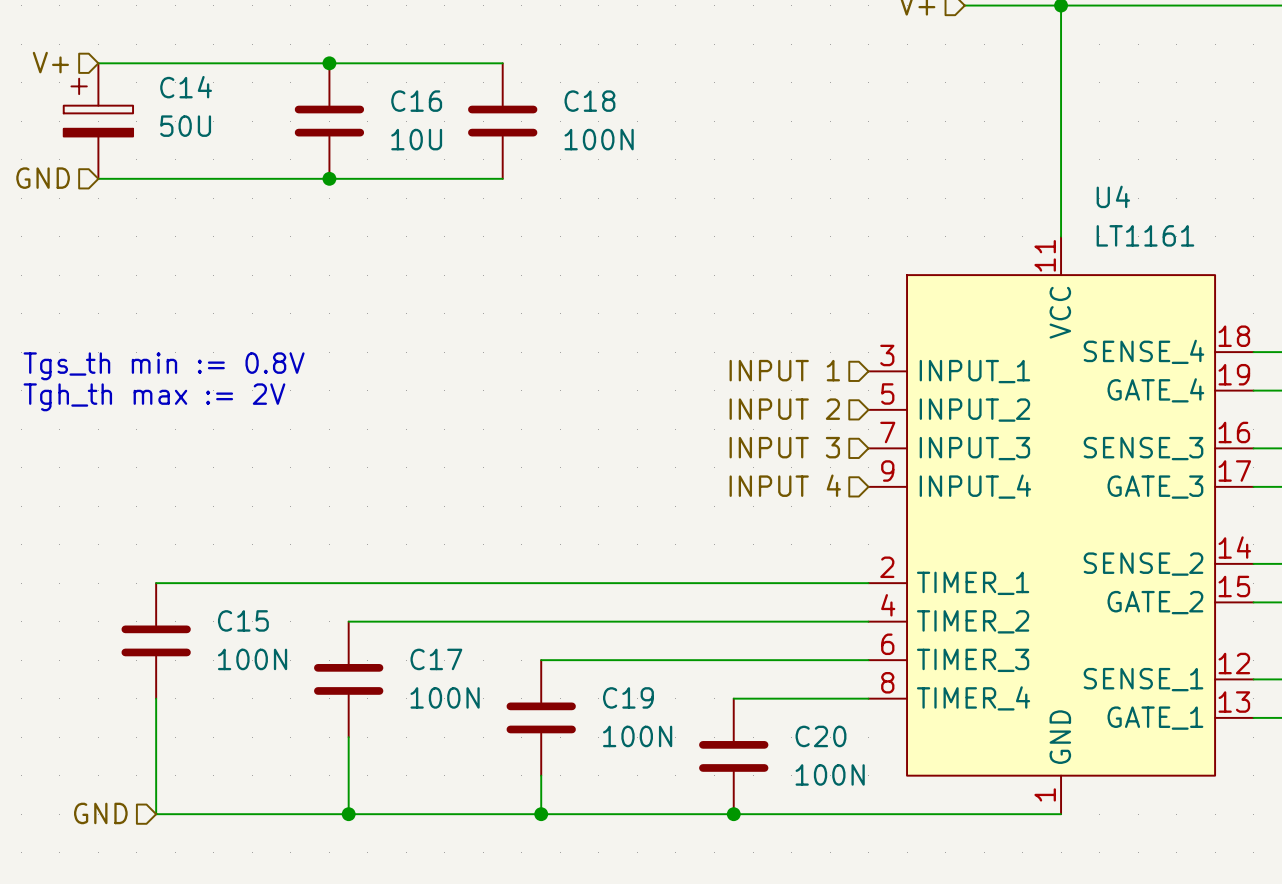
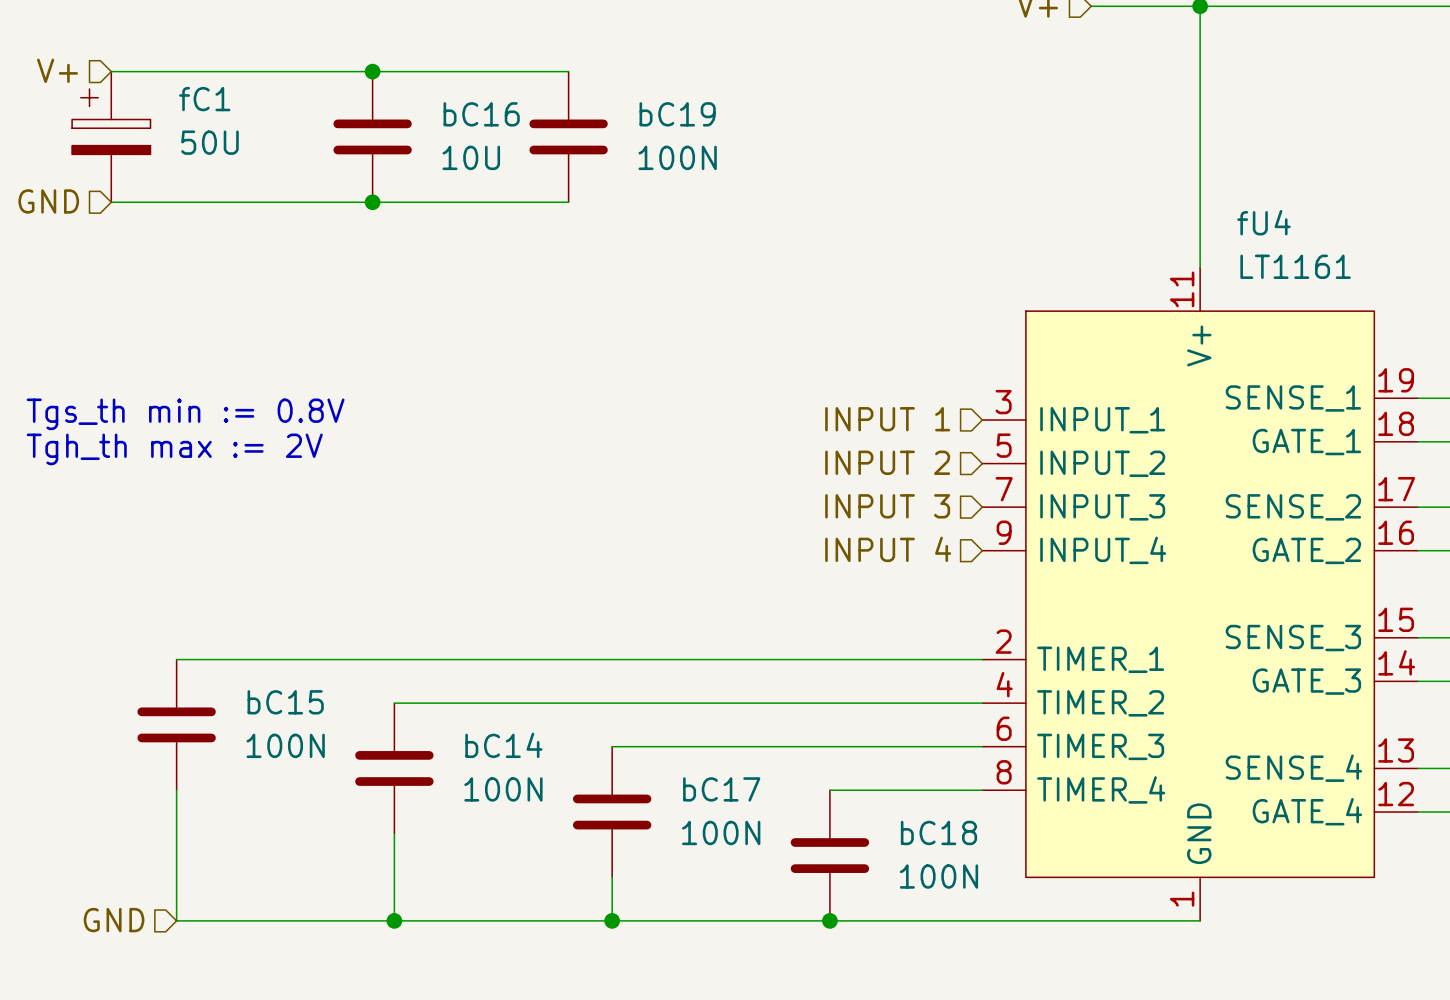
C14 name: C14 (186, 87) -> fC1 (204, 99)
C16 name: C16 (416, 101) -> bC16 (481, 114)
C18 name: C18 (589, 101) -> bC19 (677, 114)
U4 name: U4 (1113, 196) -> fU4 (1263, 222)
U4 symbol: [868, 236, 1254, 815] -> [982, 267, 1418, 921]
C15 name: C15 (243, 620) -> bC15 (285, 702)
C17 name: C17 (436, 659) -> bC14 (503, 745)
C19 name: C19 (628, 697) -> bC17 (721, 789)
C20 name: C20 (820, 736) -> bC18 (938, 832)

